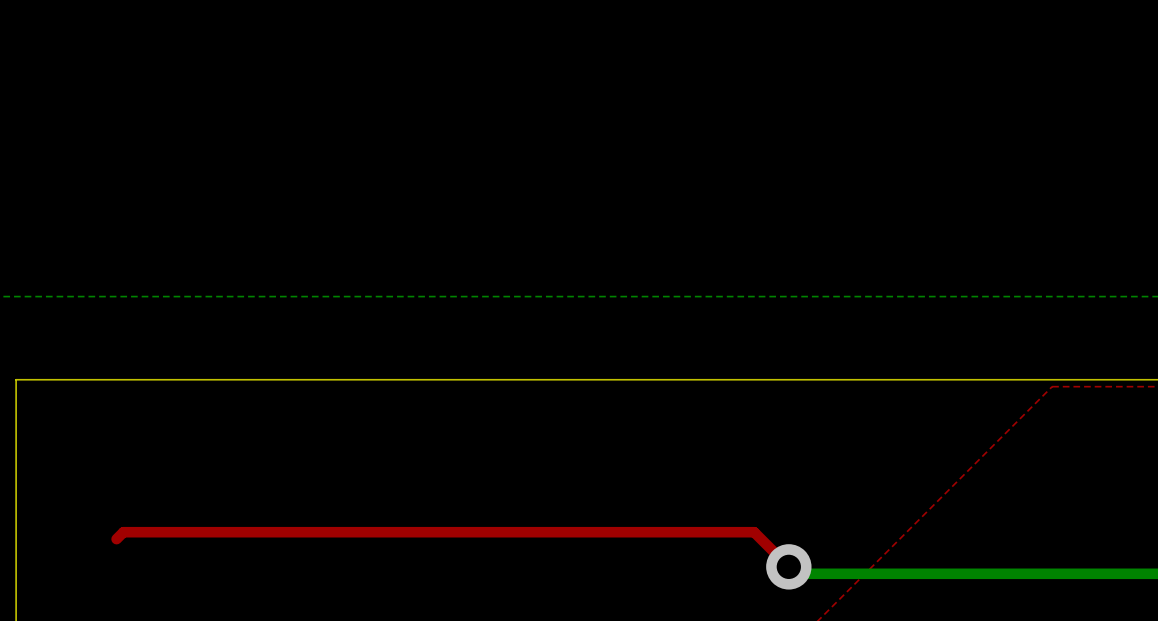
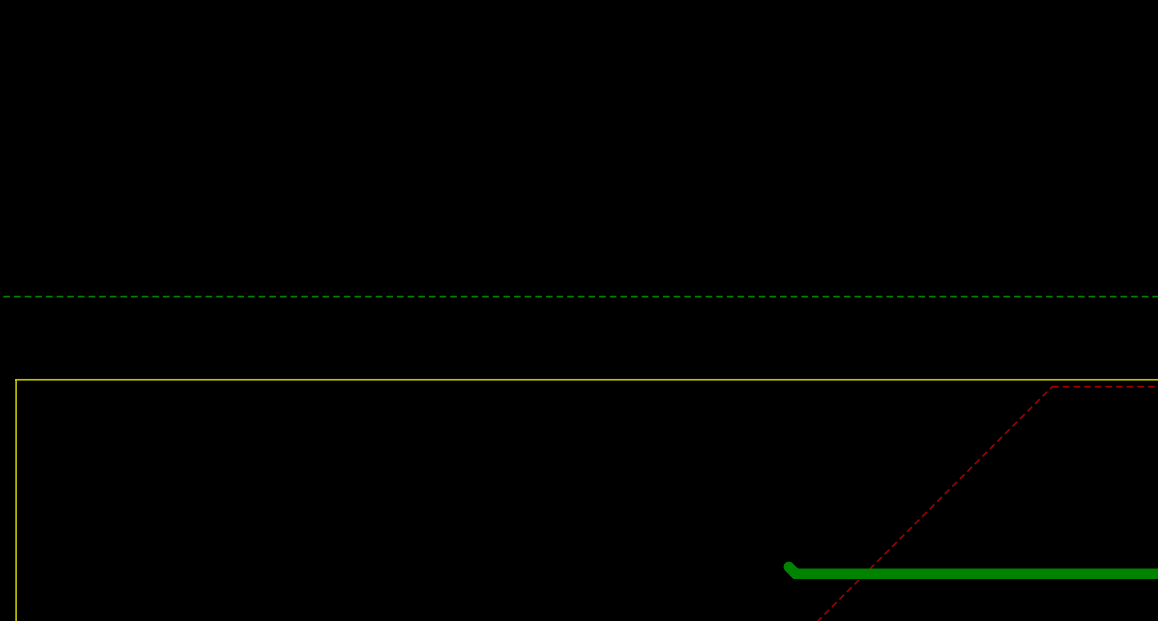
top track: (116, 539) (123, 532) (754, 532) (788, 566) -> none
via: (788, 566) -> none

